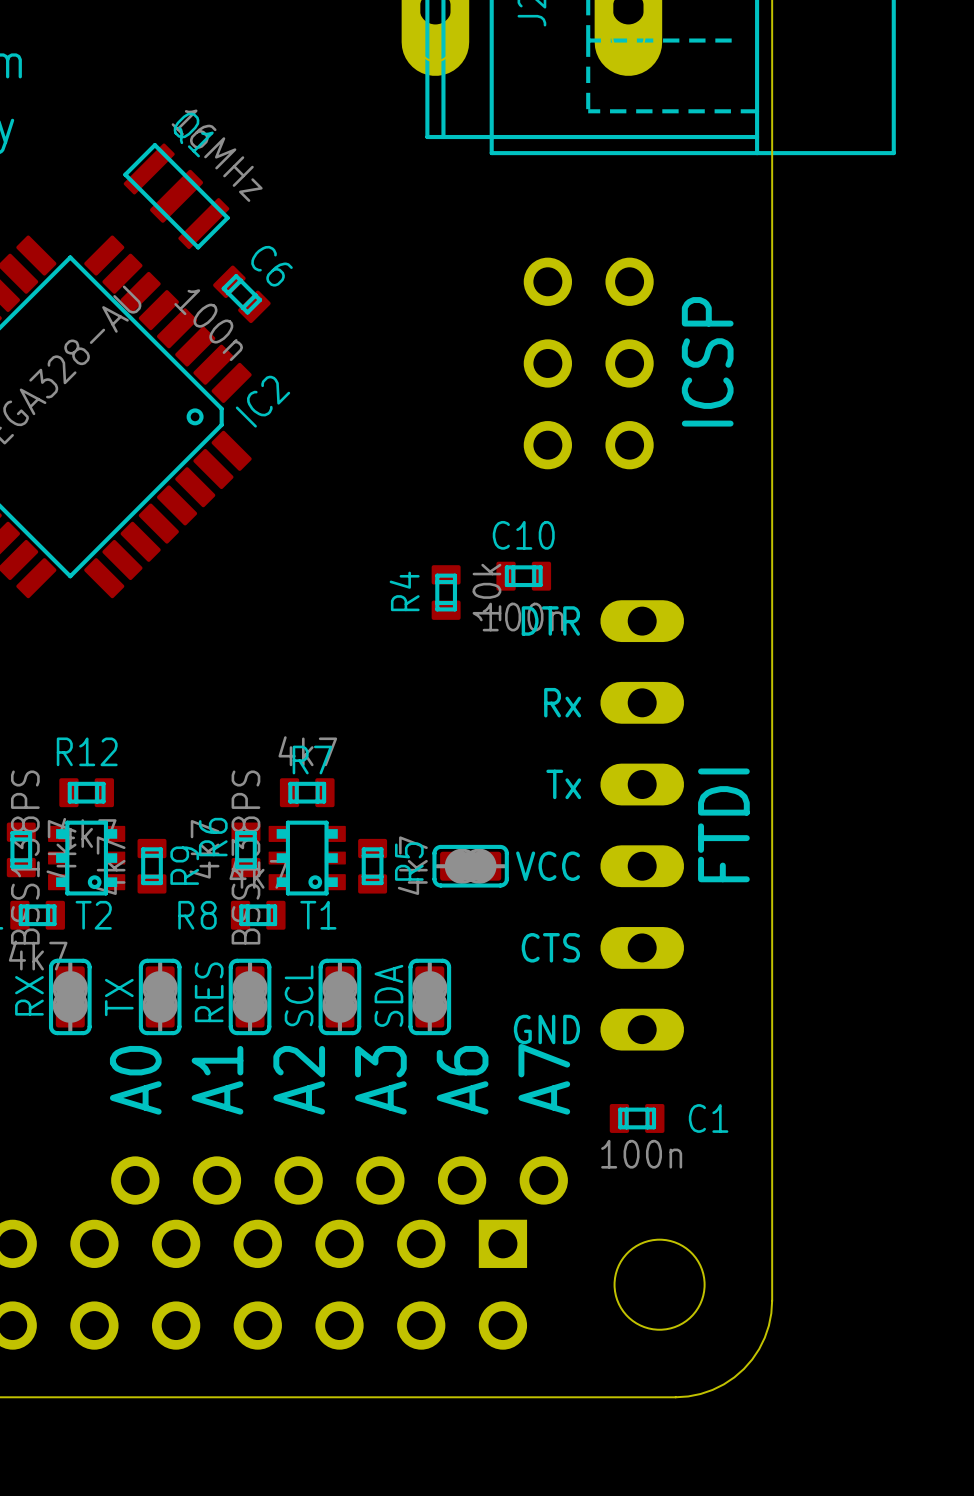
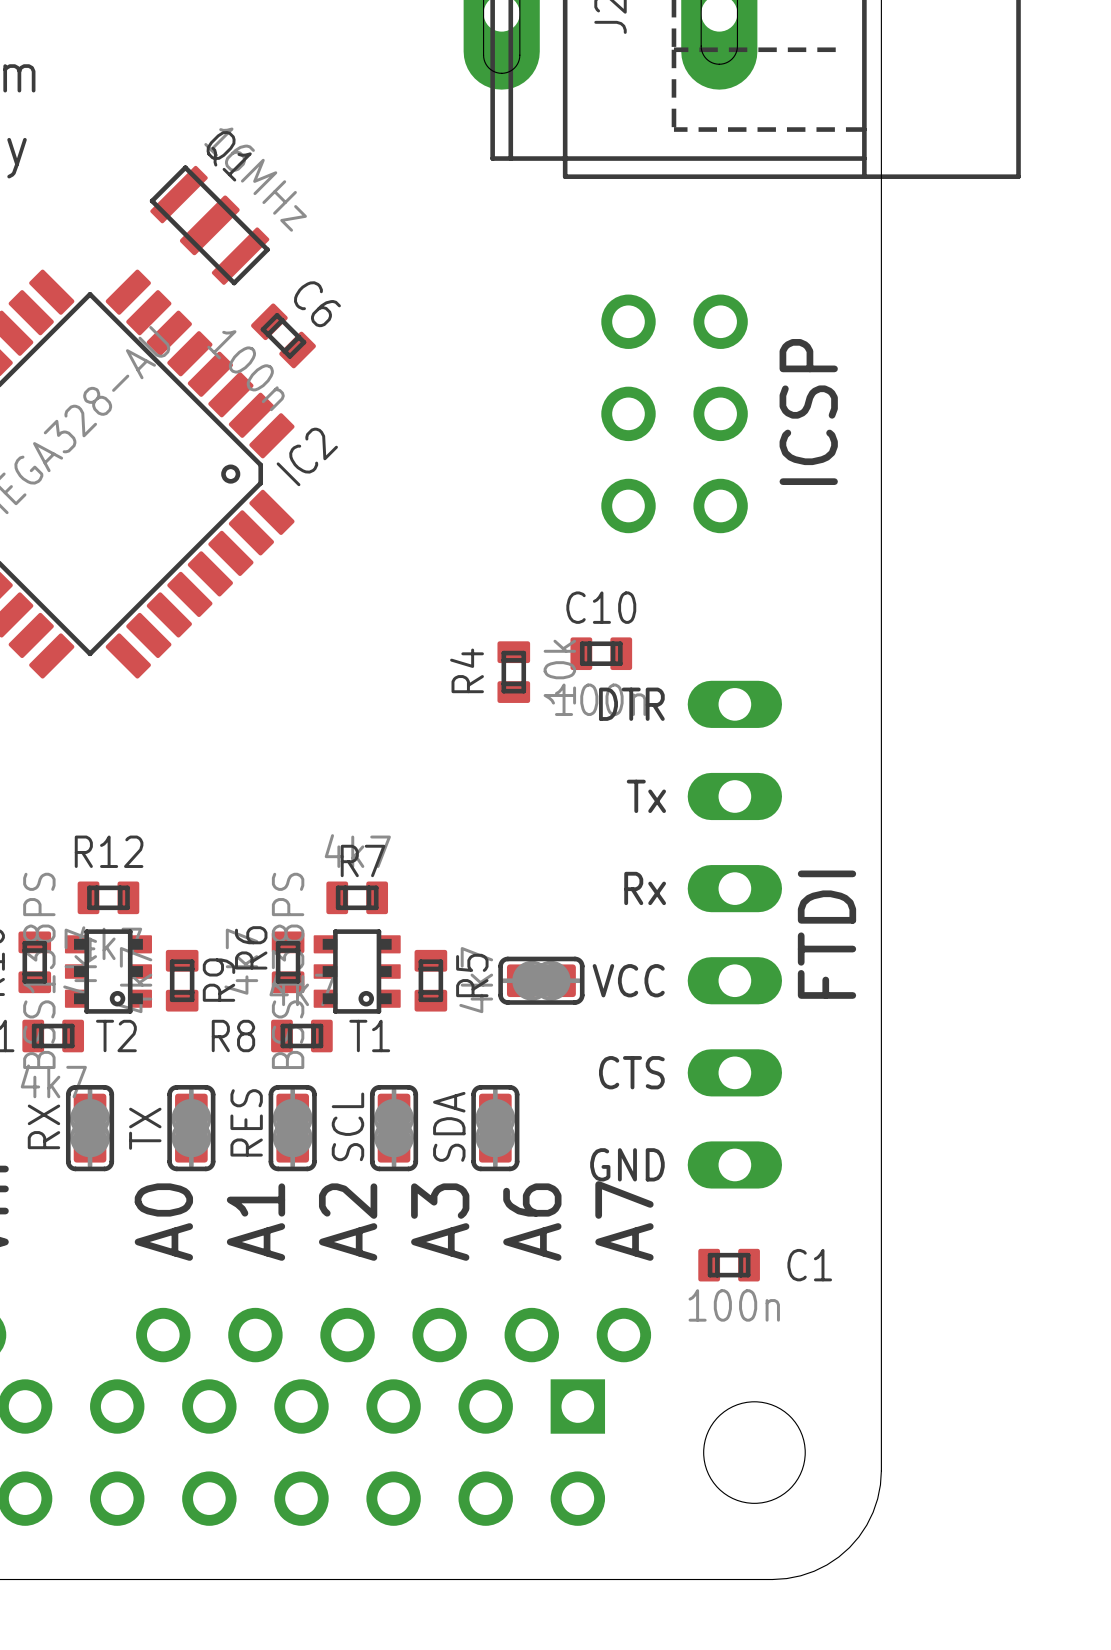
text: Rx (562, 702) -> Tx (646, 796)
text: Tx (563, 784) -> Rx (645, 888)

